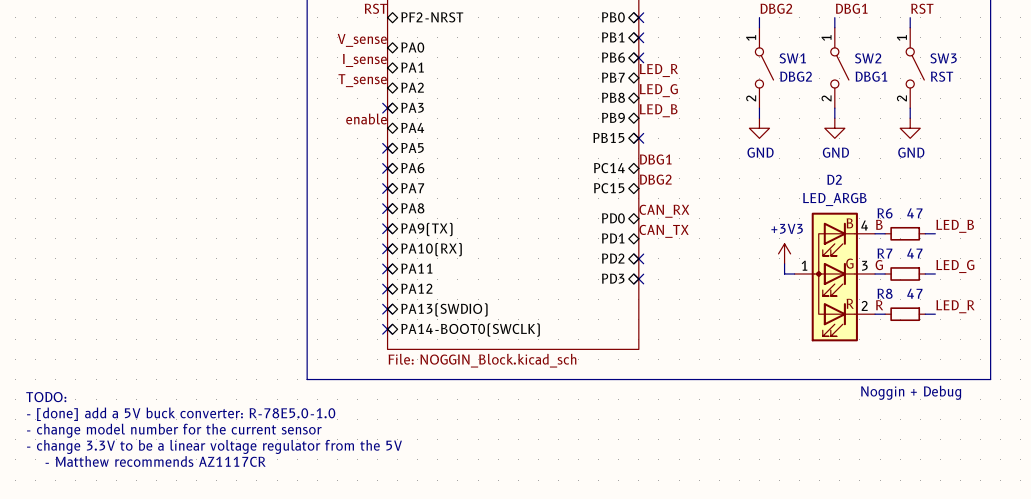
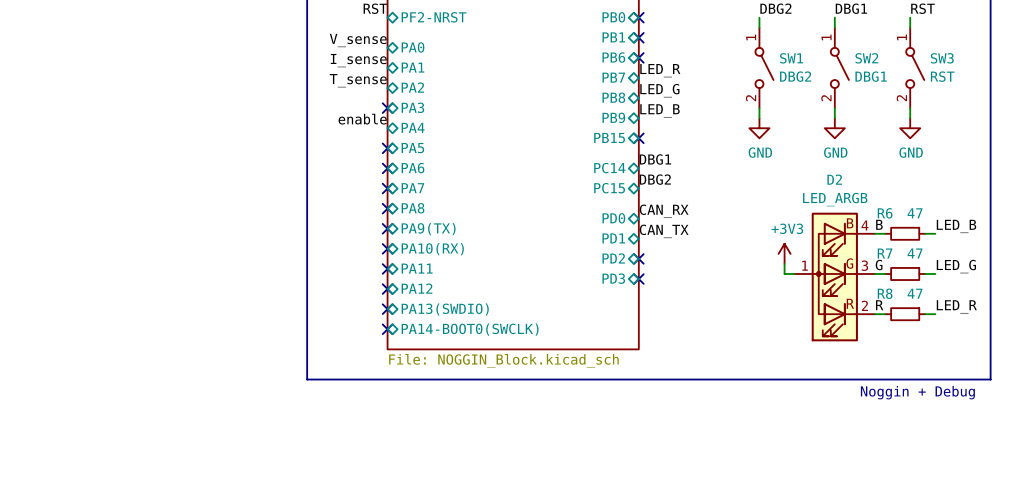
text: TODO: (46, 397) -> none
text: - [done] add a 5V buck converter: R-78E5.0-1.0 (181, 414) -> none
text: - change model number for the current sensor (174, 430) -> none
text: - change 3.3V to be a linear voltage regulator from the 5V (214, 446) -> none
text: - Matthew recommends AZ1117CR (155, 461) -> none

